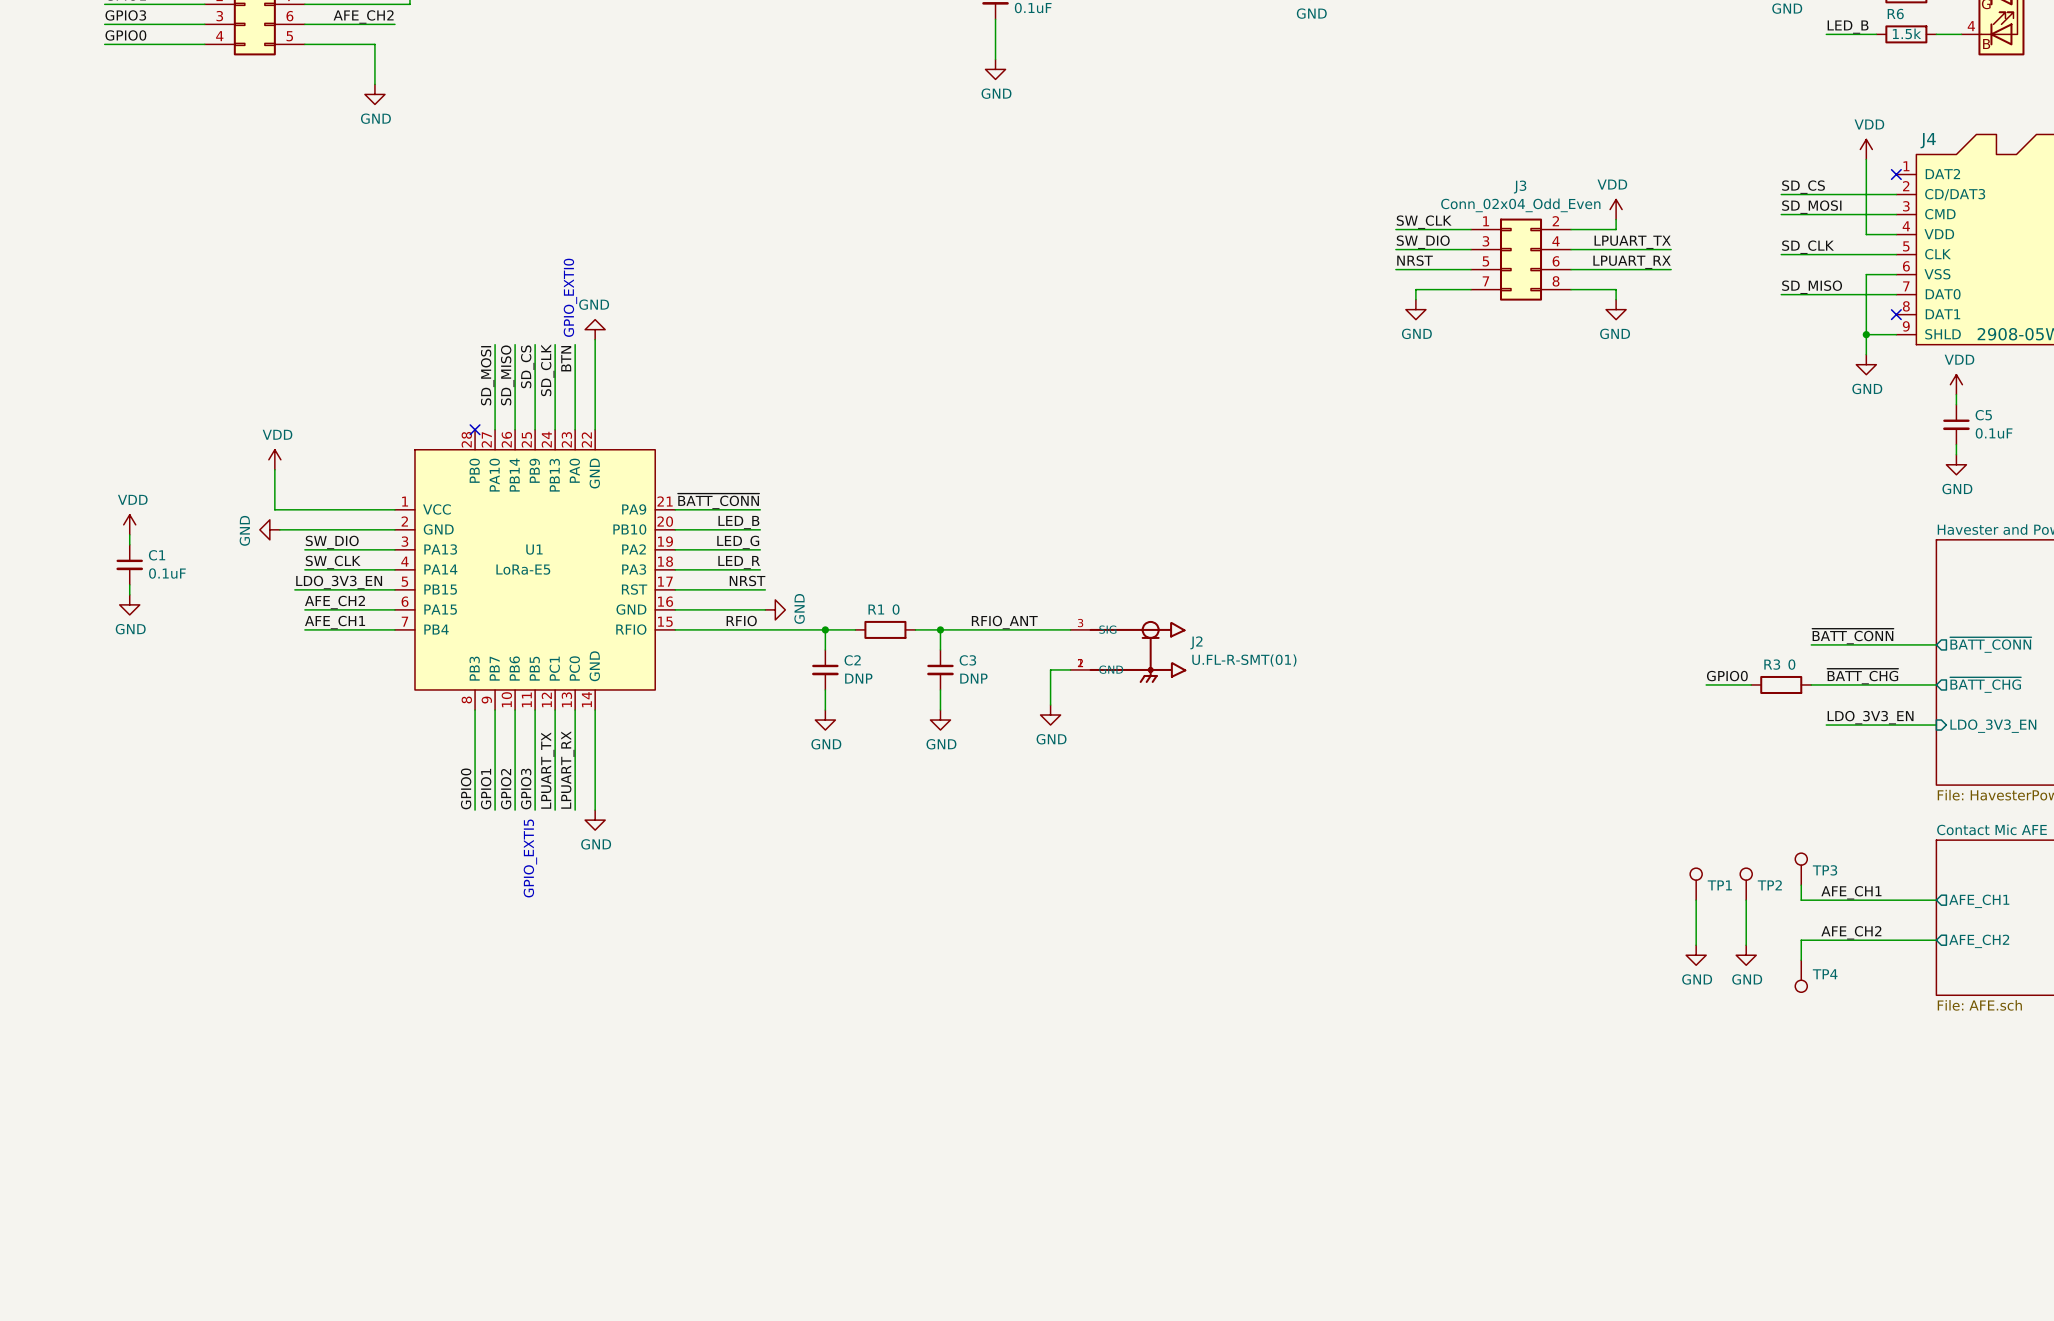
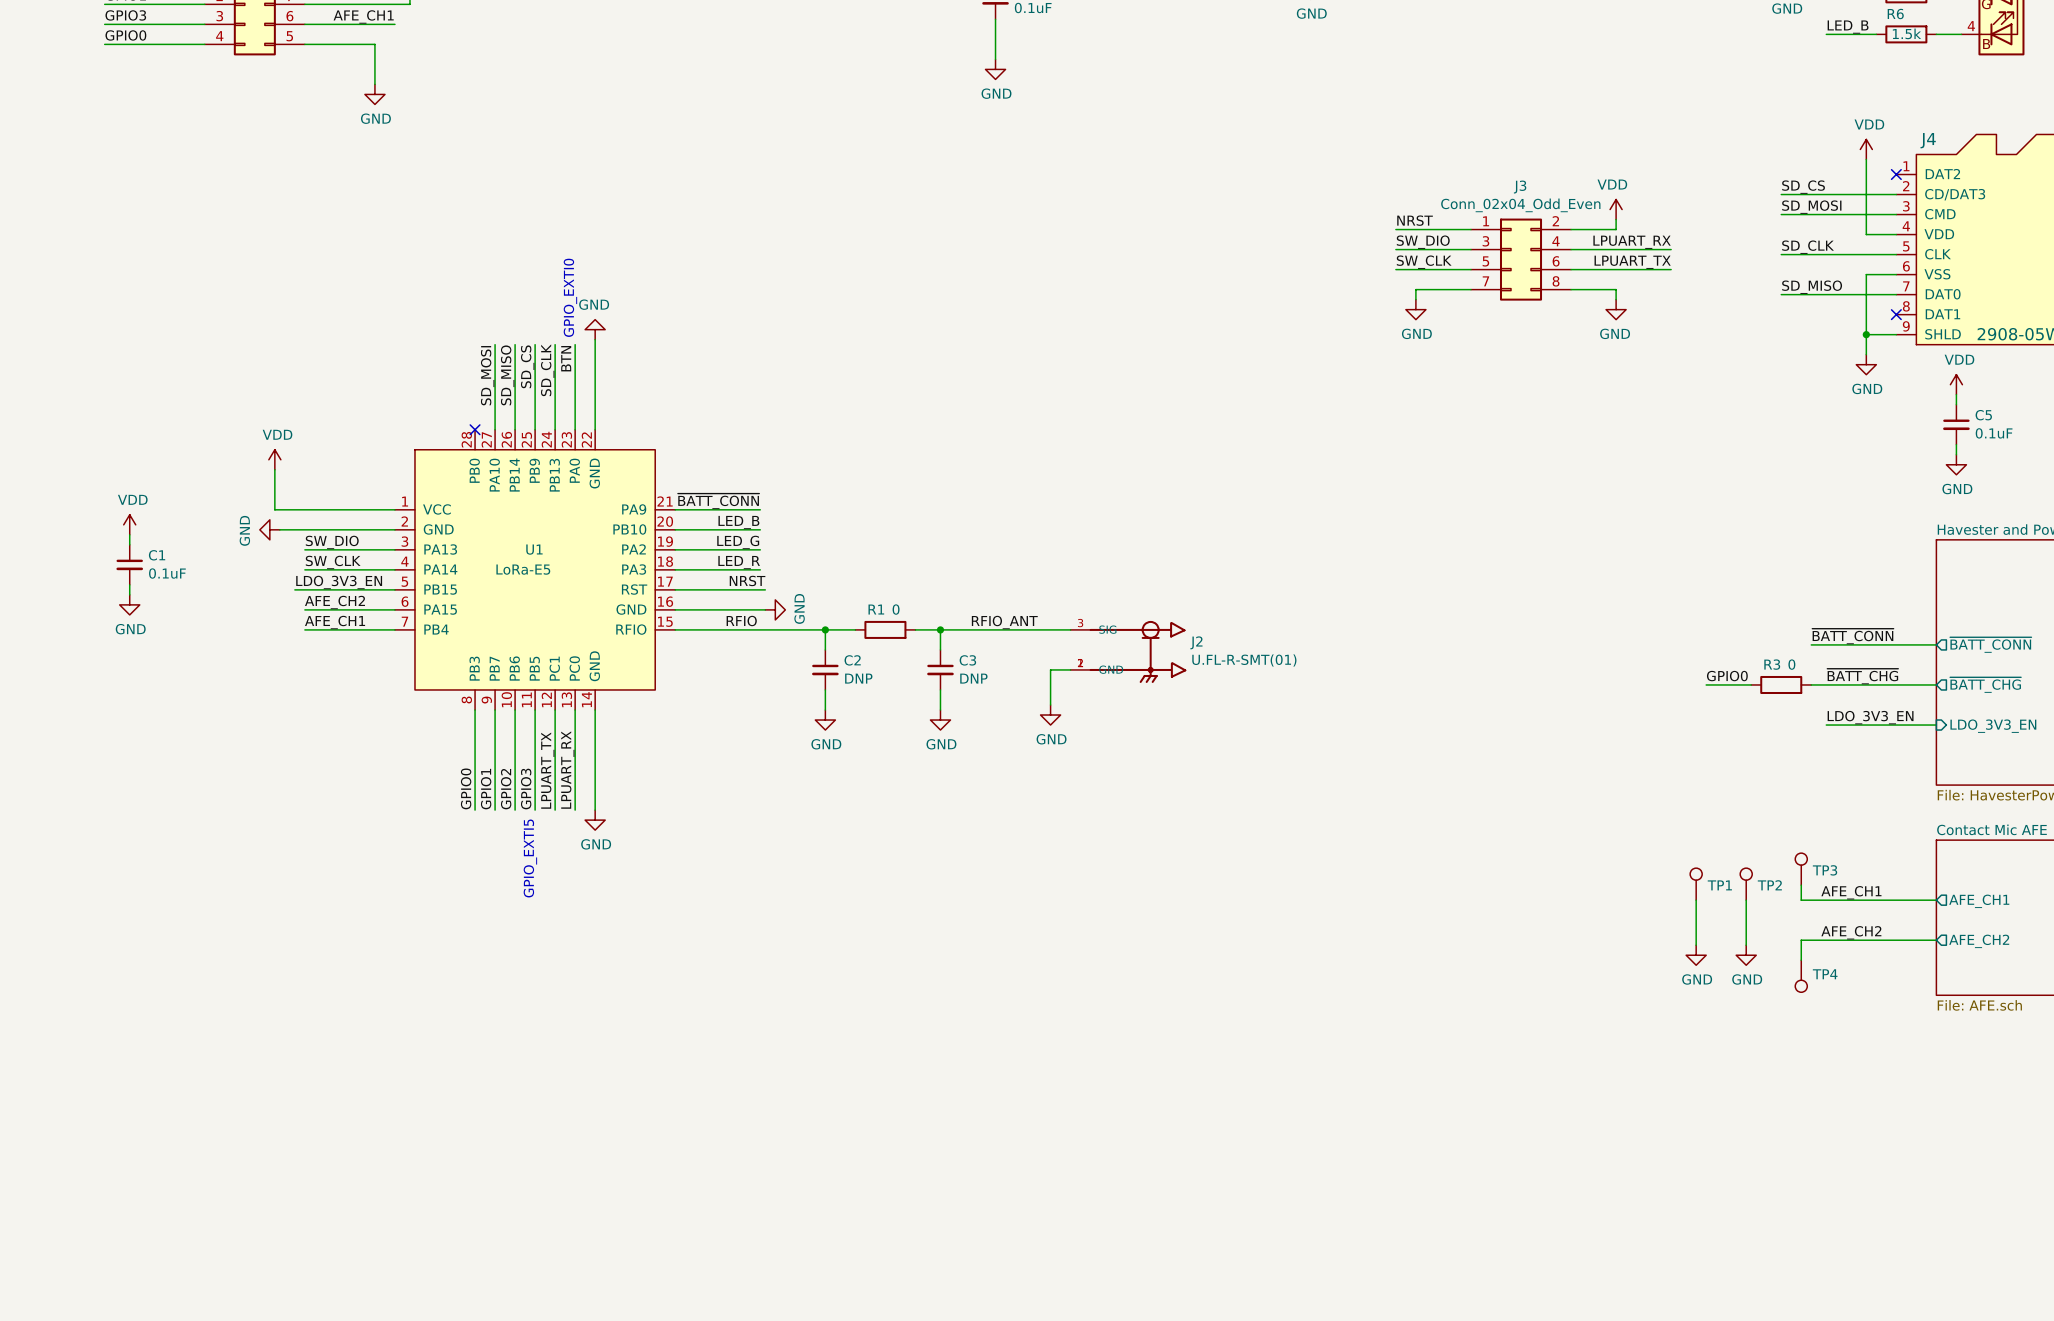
label: AFE_CH2 (363, 16) -> AFE_CH1 (363, 16)
label: SW_CLK (1424, 222) -> NRST (1415, 220)
label: LPUART_TX (1632, 242) -> LPUART_RX (1632, 242)
label: NRST (1415, 260) -> SW_CLK (1424, 262)
label: LPUART_RX (1632, 262) -> LPUART_TX (1632, 262)

